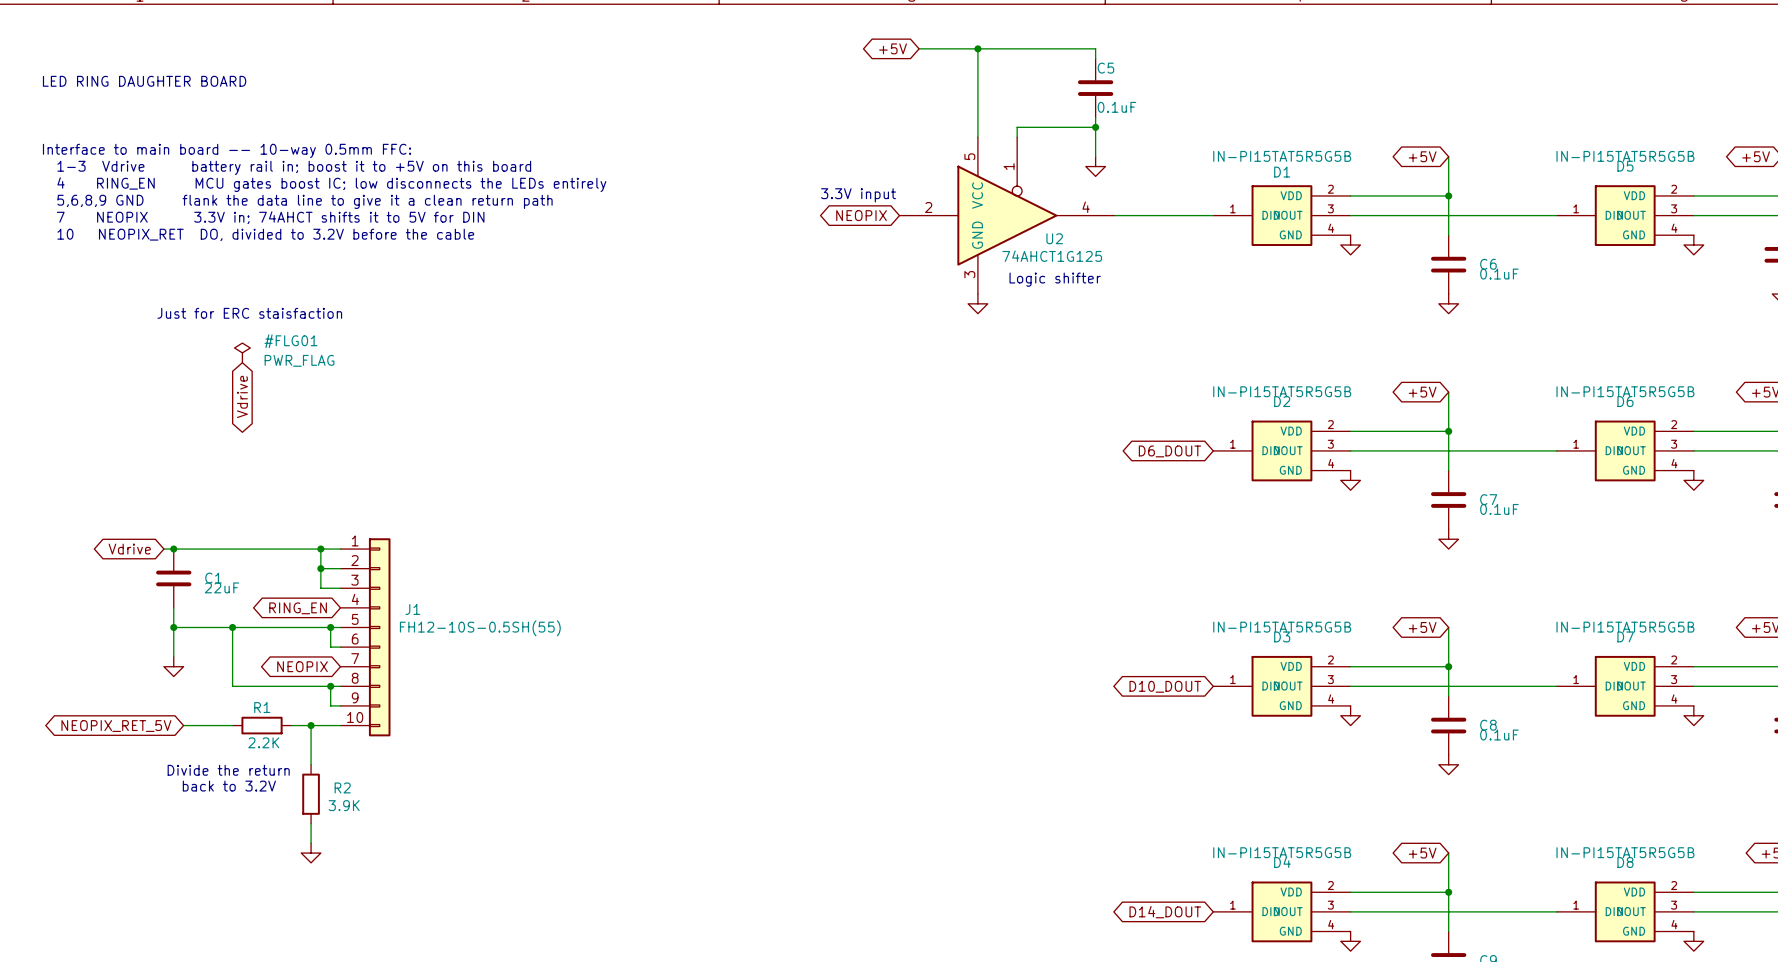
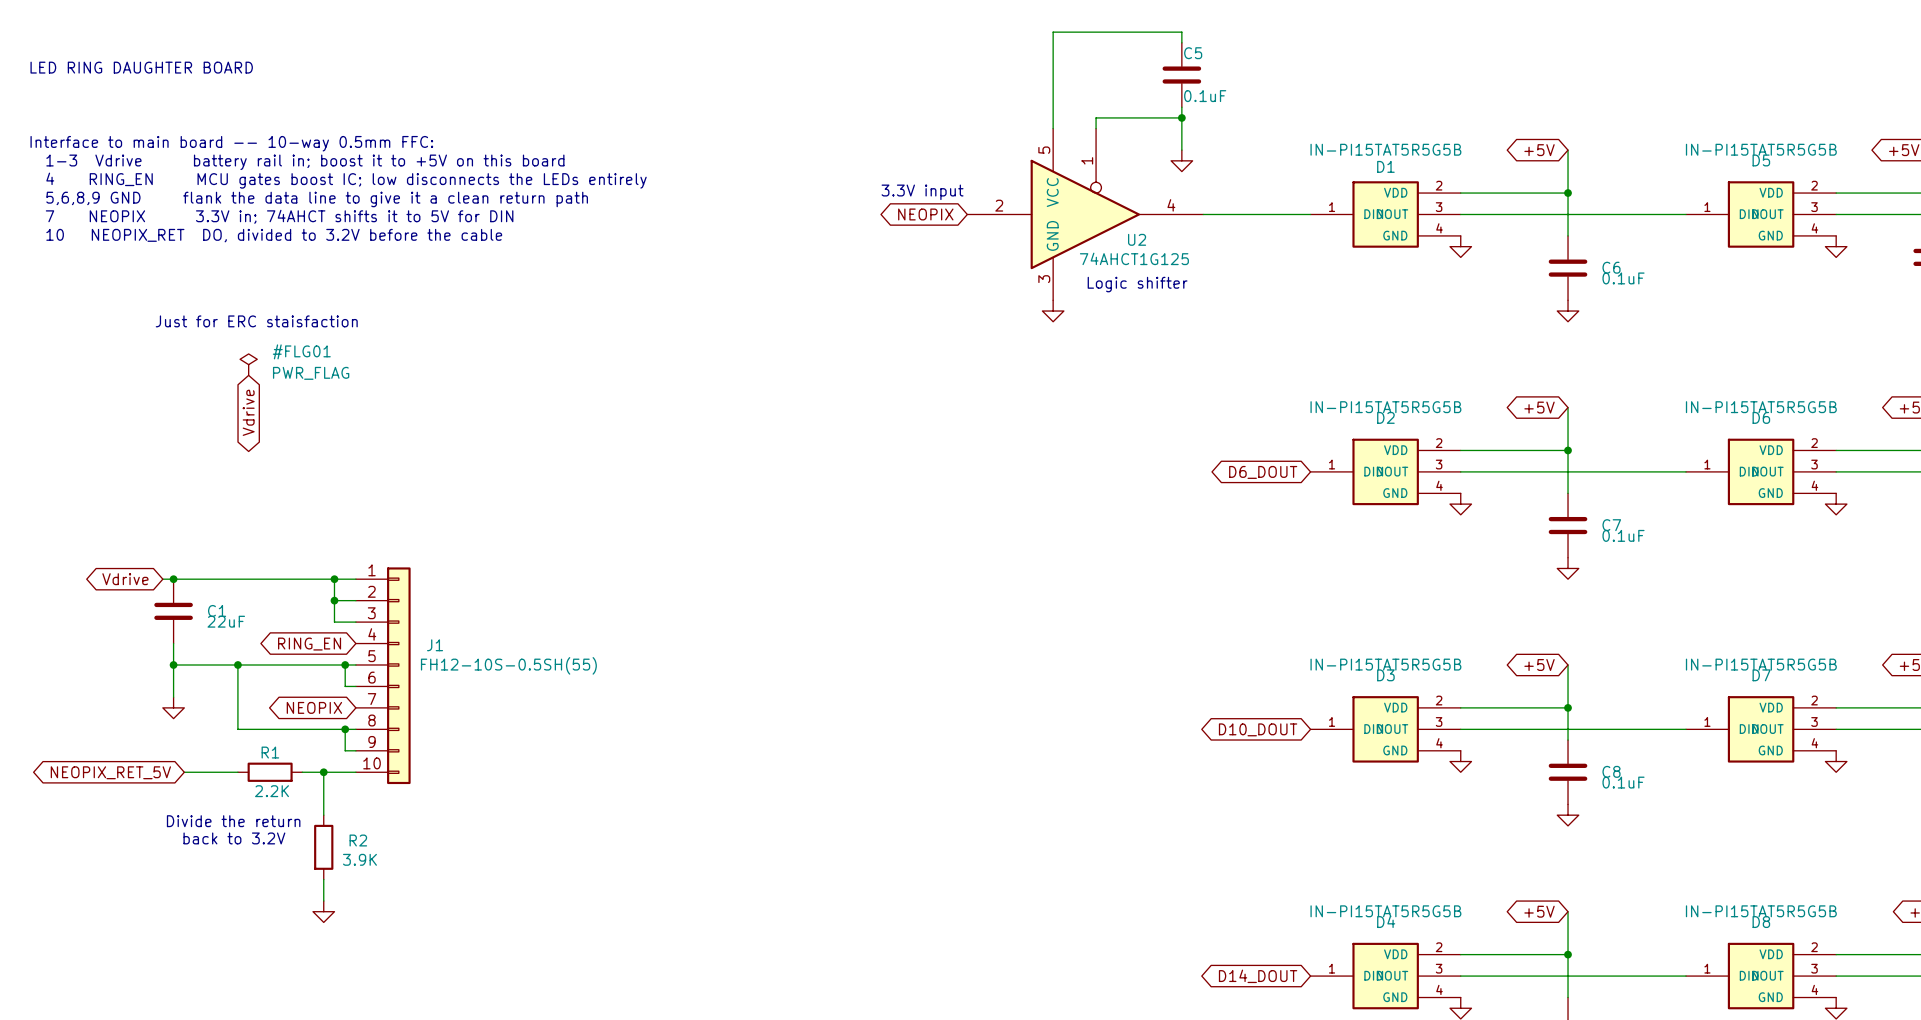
global label: +5V (893, 48) -> none
wire: (919, 48) (977, 48) -> none
junction: (977, 48) -> none

